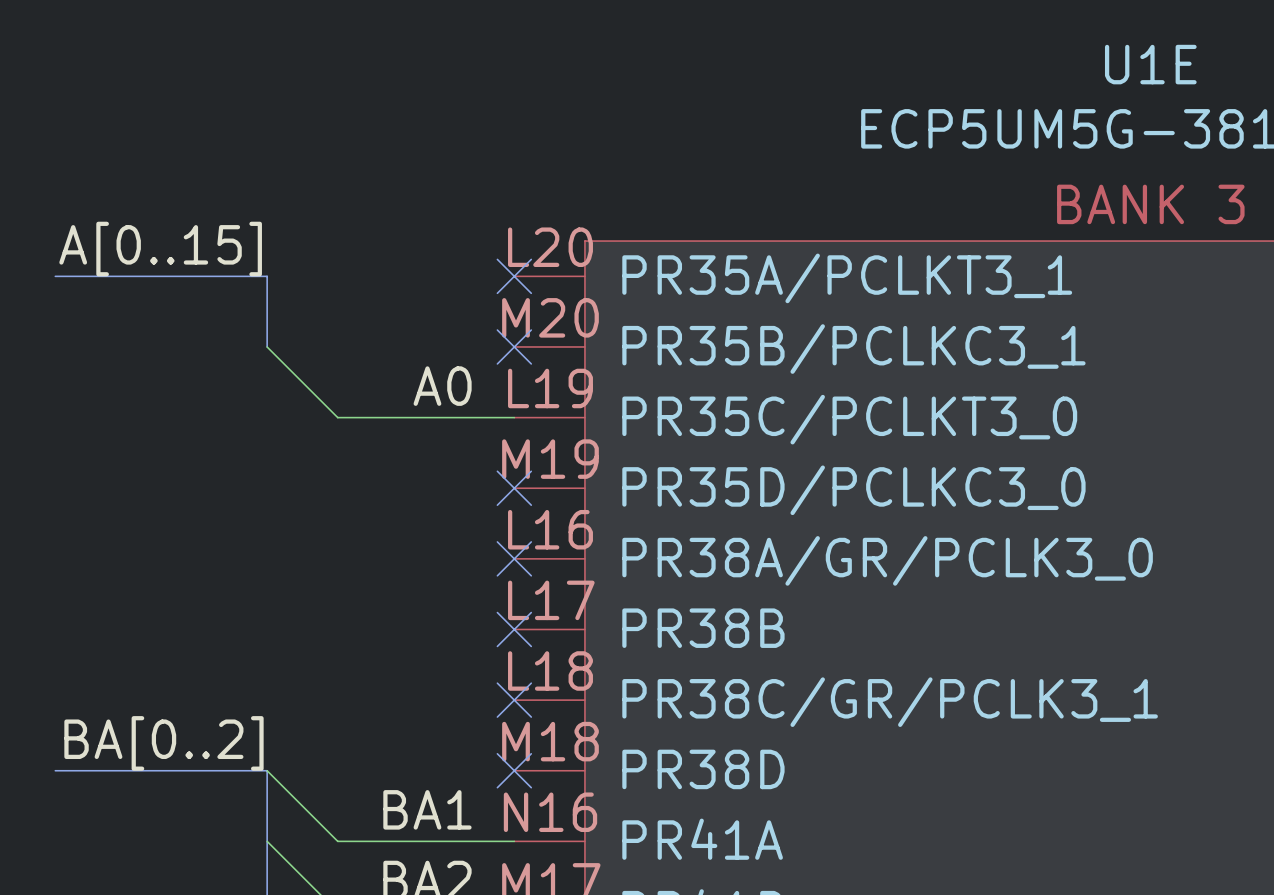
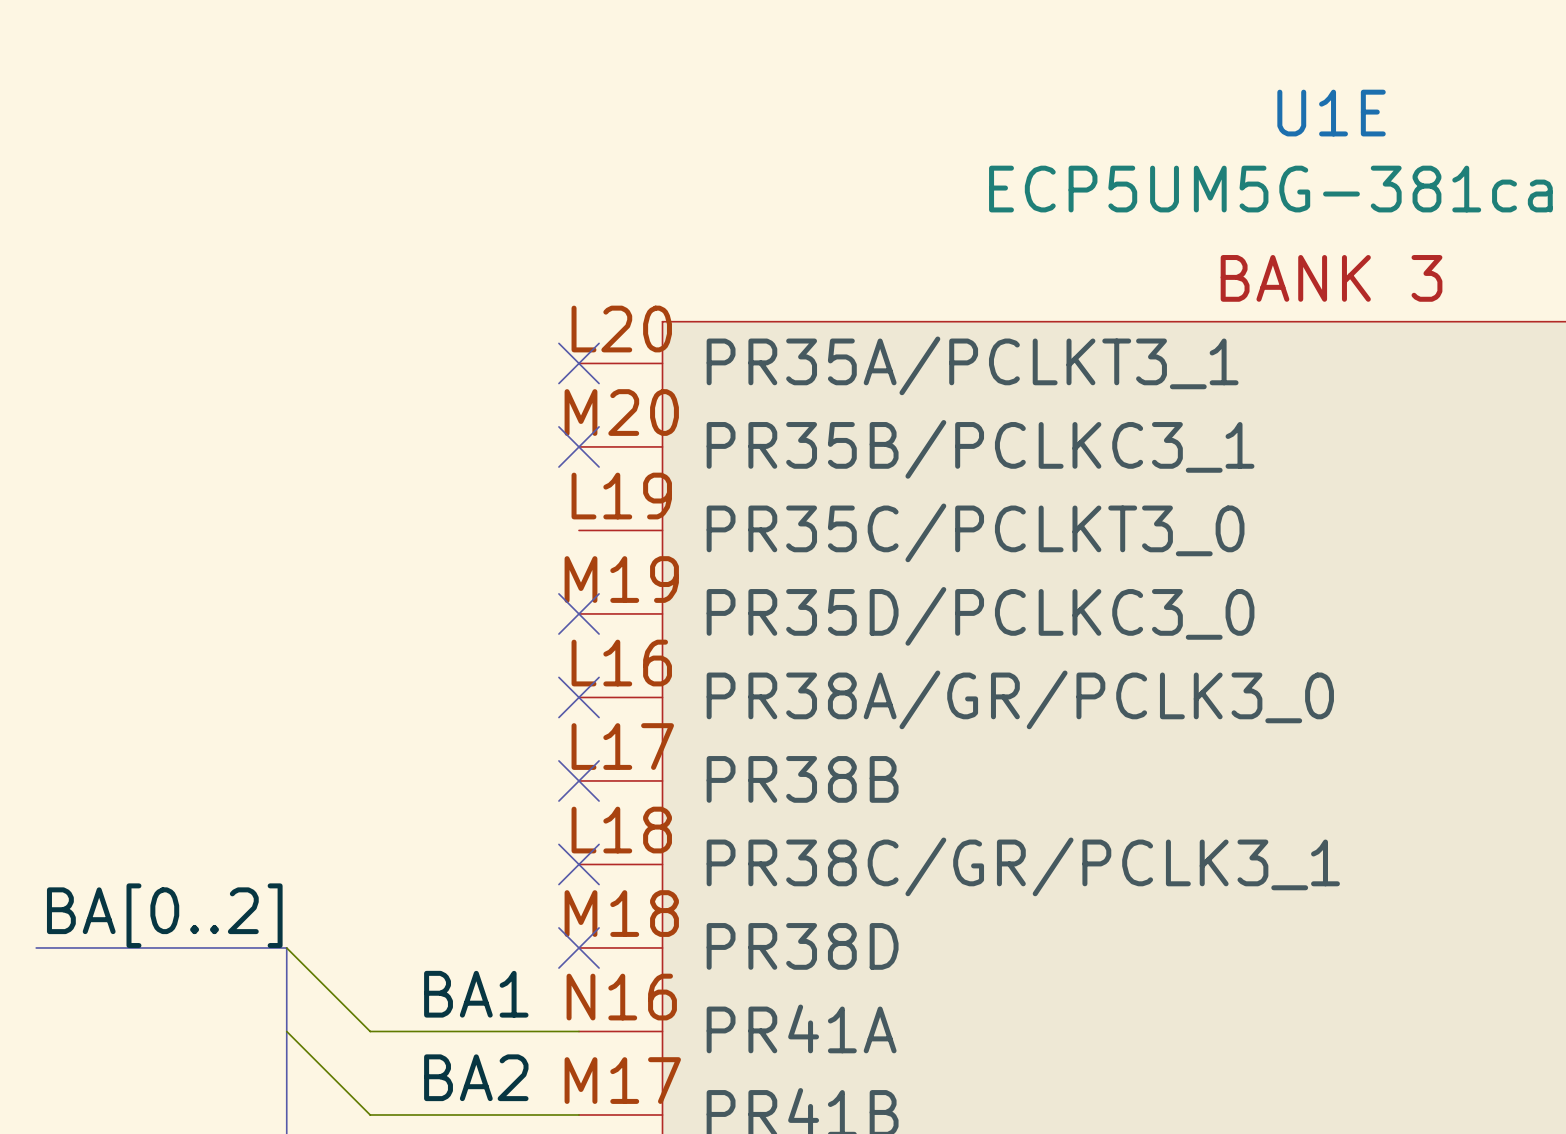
label: A[0..15] (160, 249) -> none
bus: (55, 276) (267, 276) (267, 346) -> none
wire: (267, 346) (337, 417) (514, 417) -> none
label: A0 (442, 386) -> none

